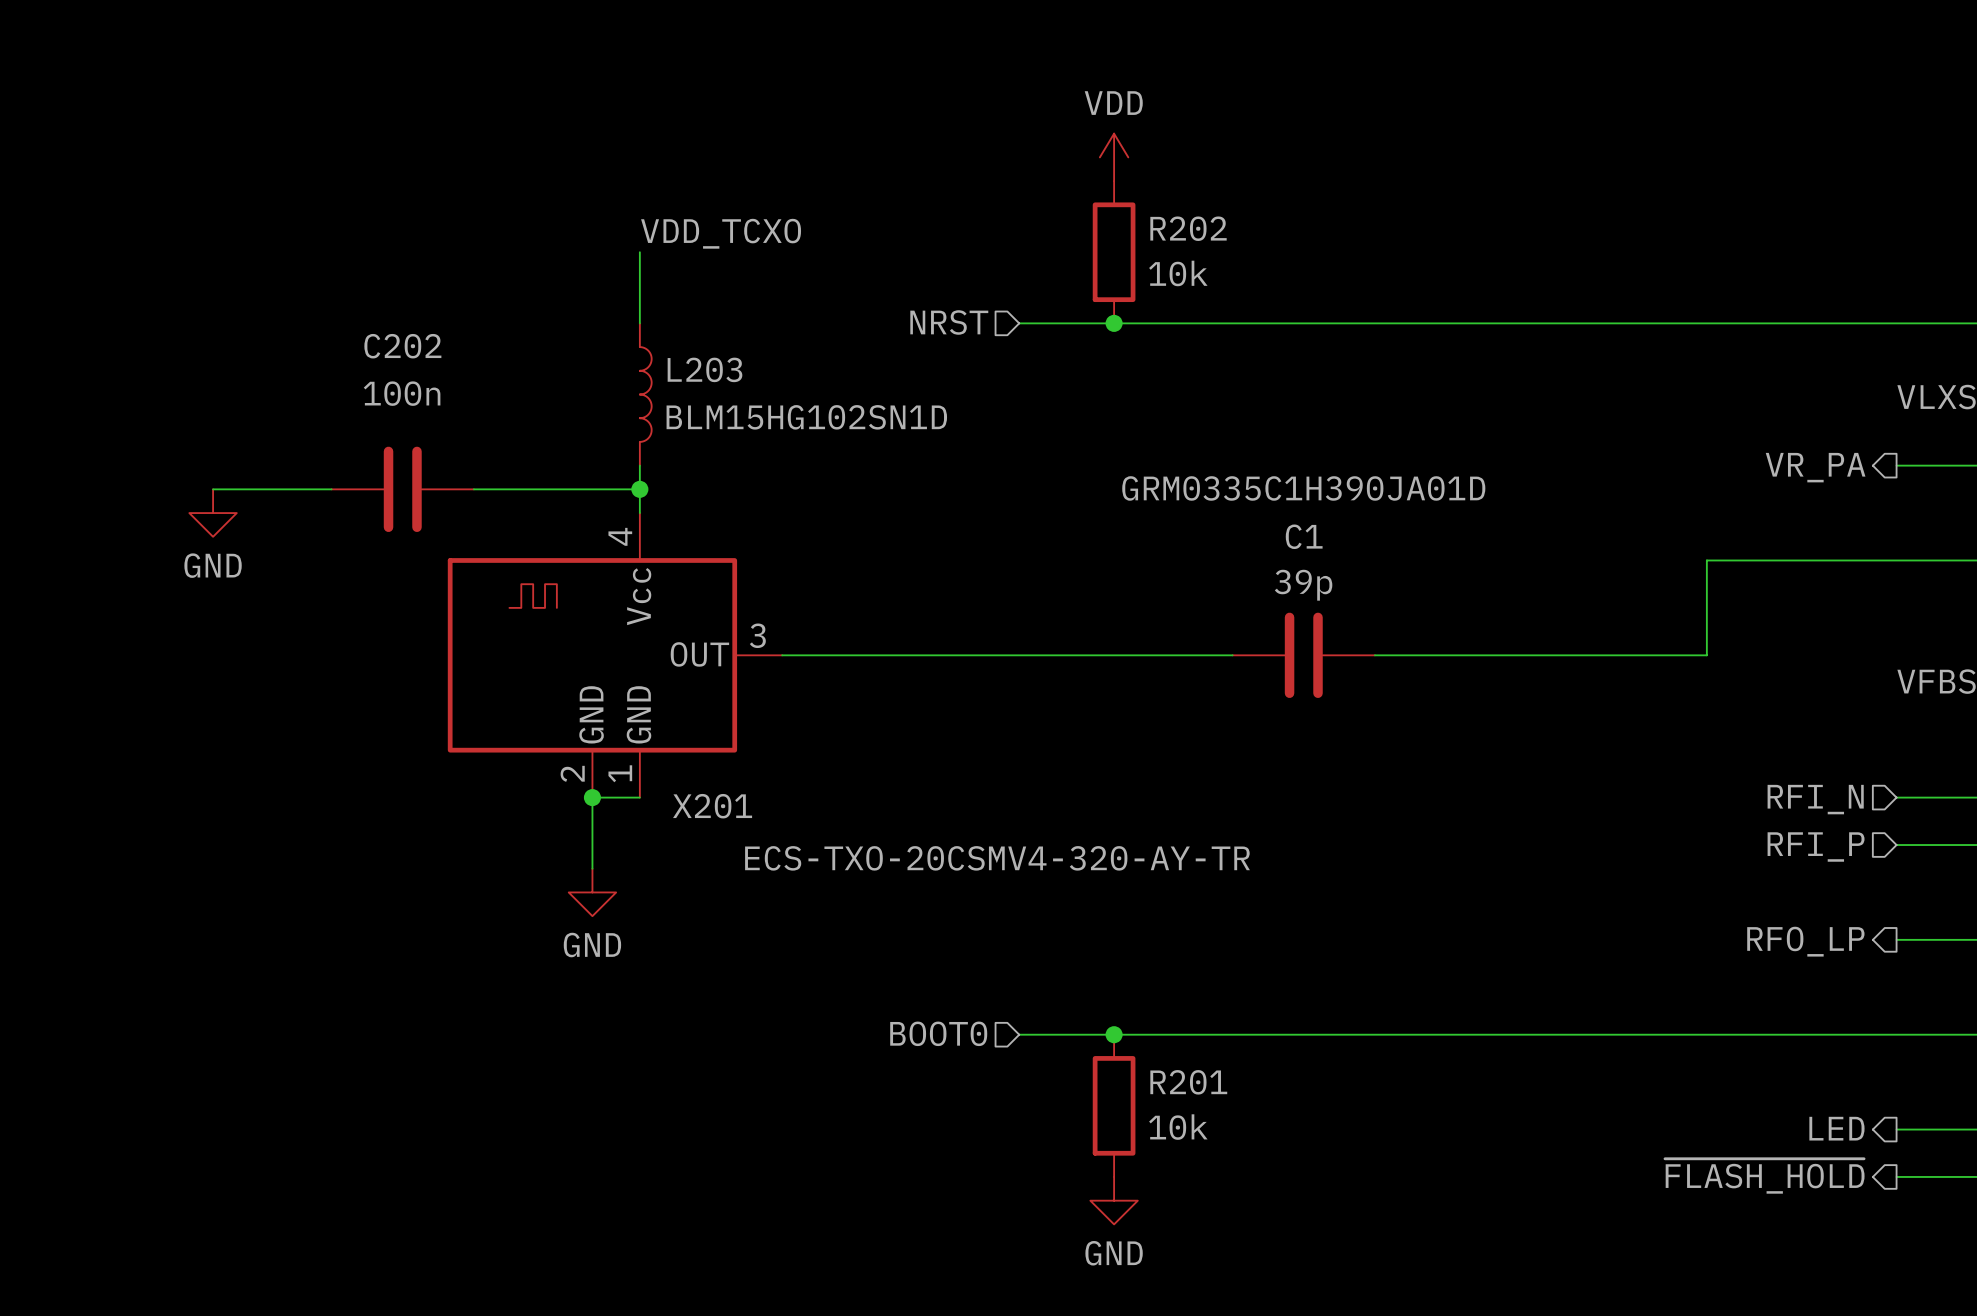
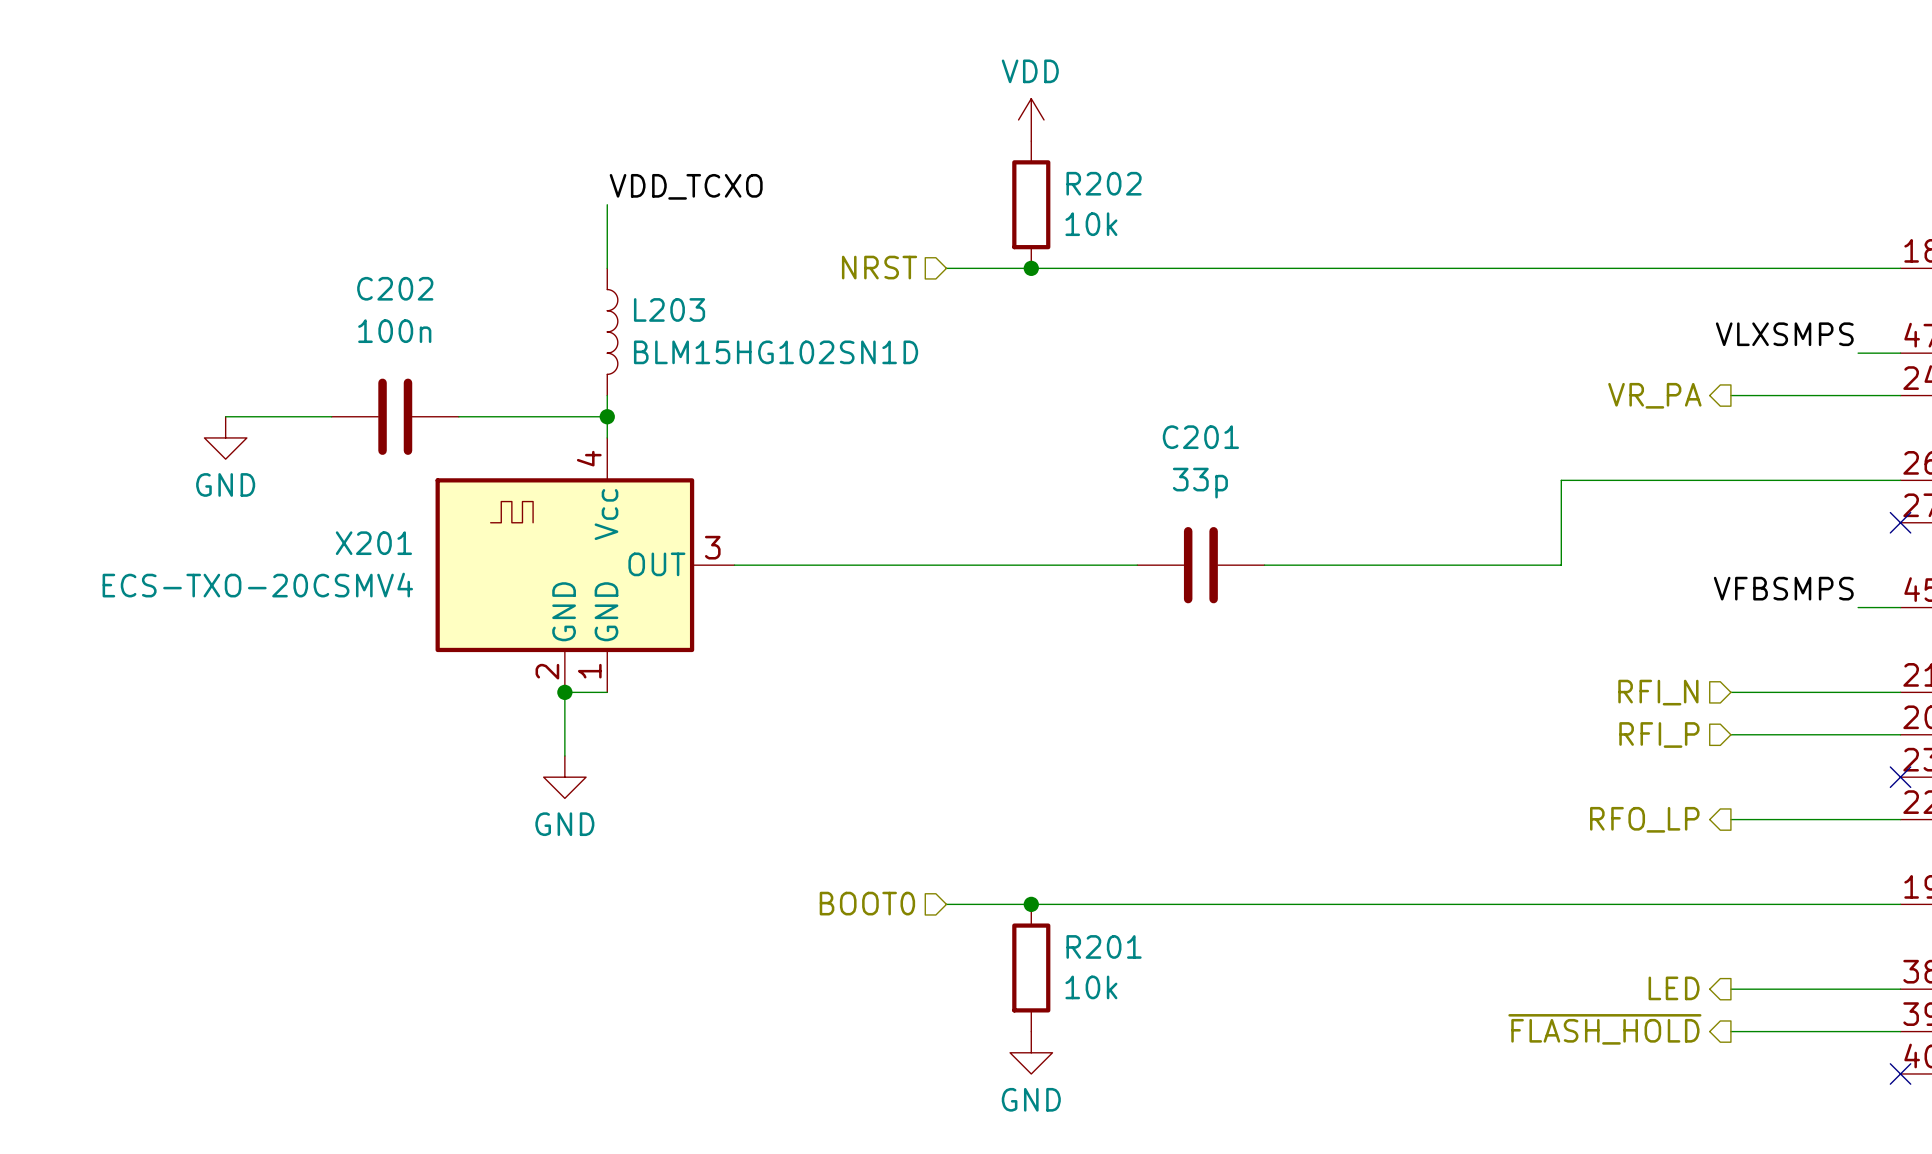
C1 text: GRM0335C1H390JA01D (1303, 488) -> none
C1 name: C1 (1304, 536) -> C201 (1200, 437)
C1 value: 39p (1303, 585) -> 33p (1200, 483)
X201 name position: X201 (712, 806) -> X201 (373, 543)
X201 value: ECS-TXO-20CSMV4-320-AY-TR (997, 858) -> ECS-TXO-20CSMV4 (257, 585)

